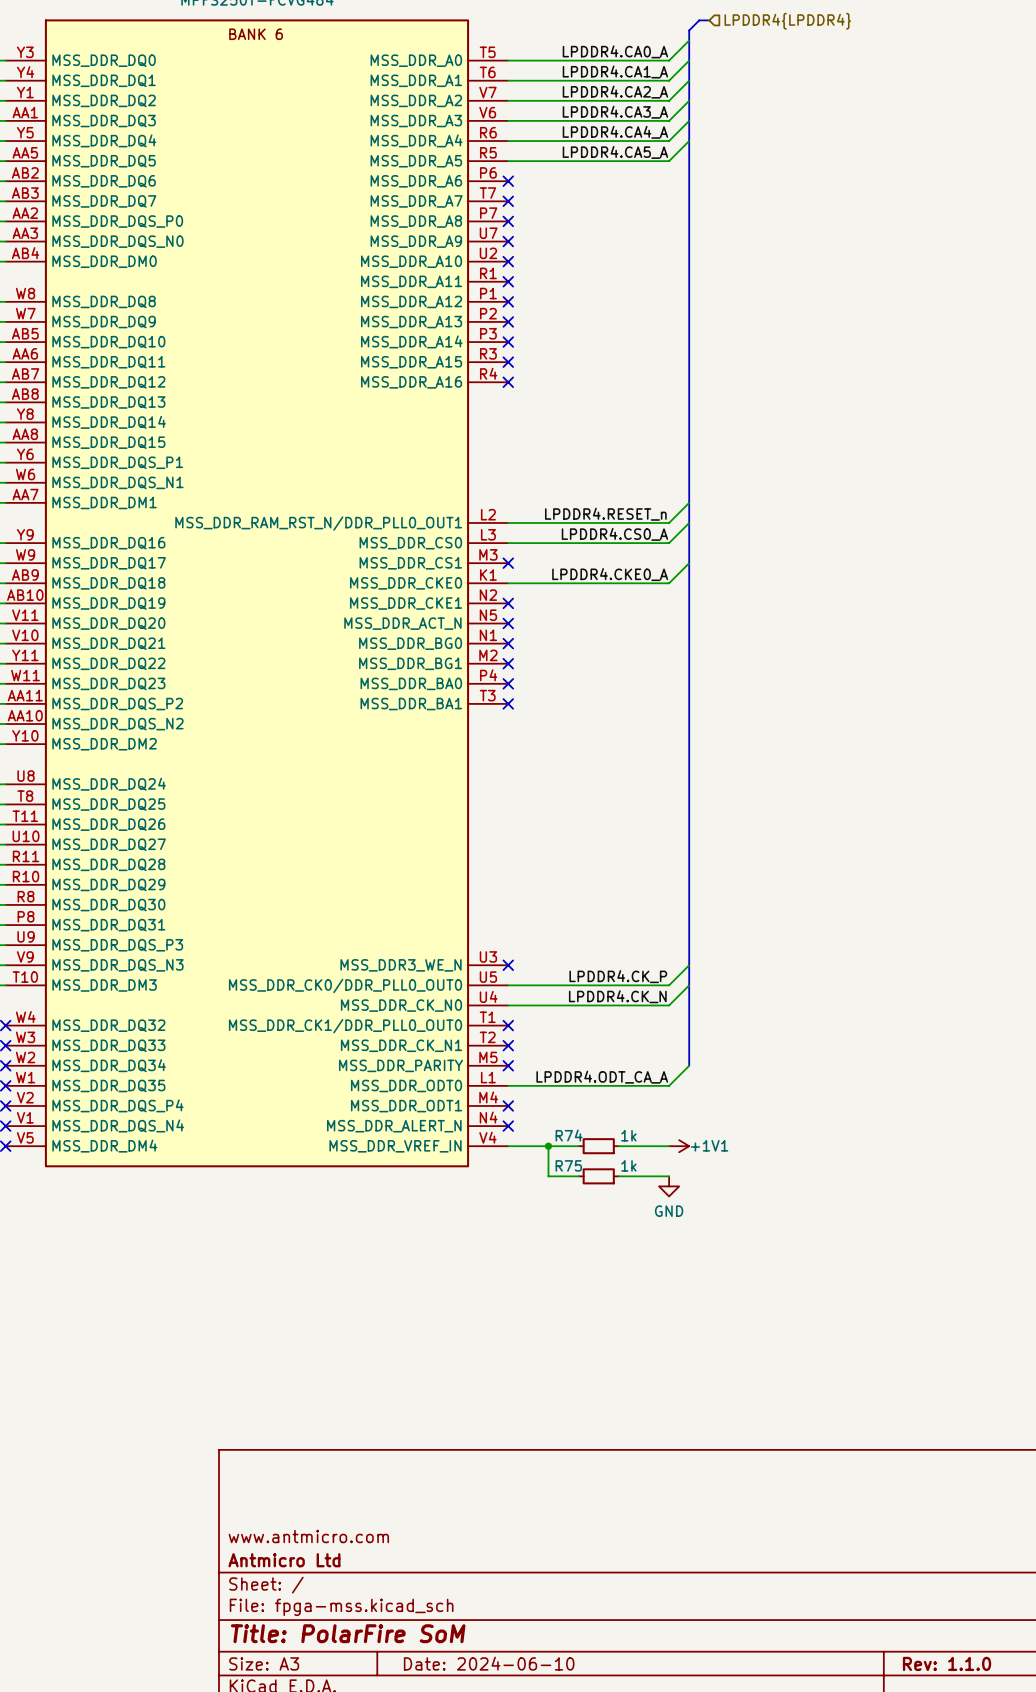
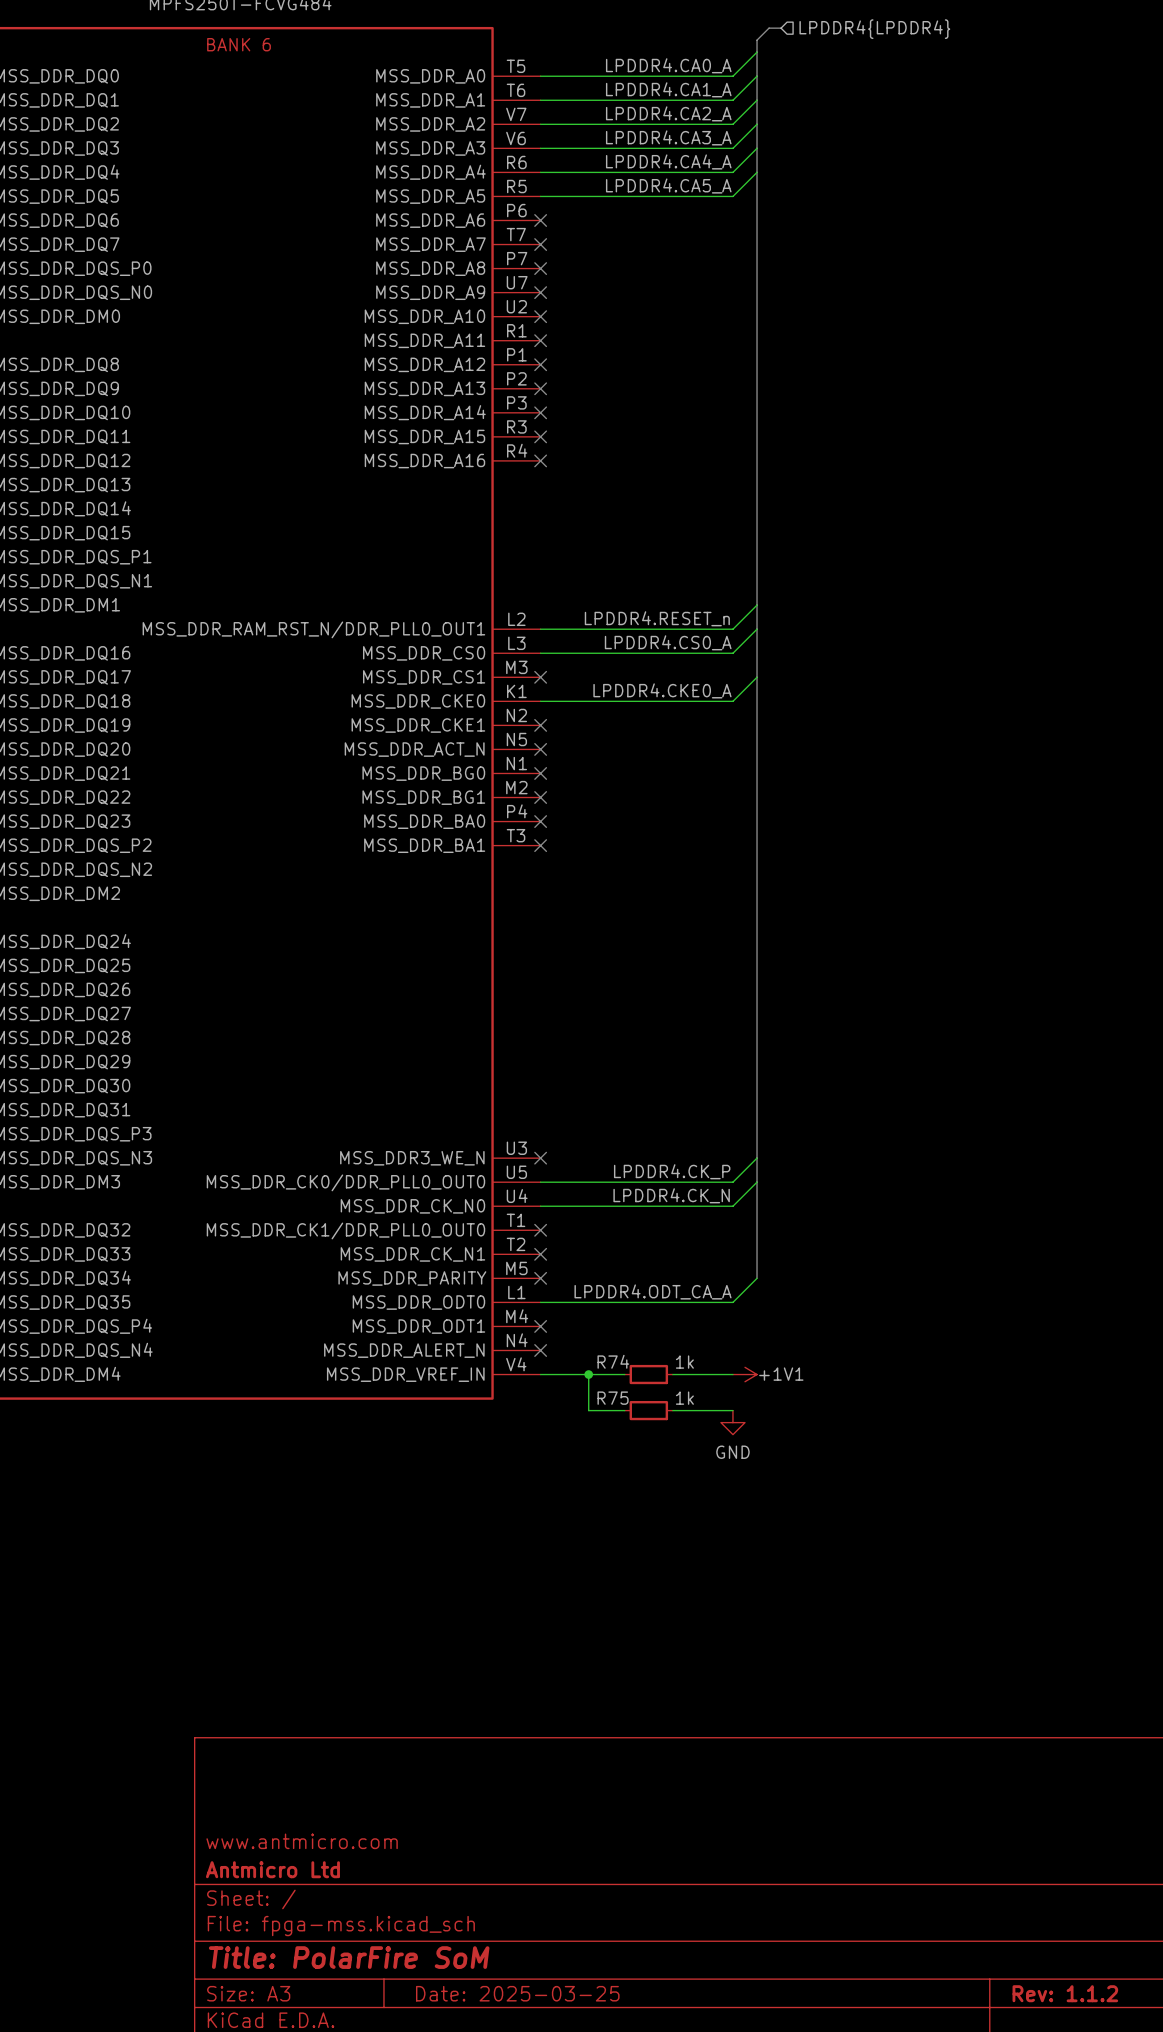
title block: Date: 2024-06-10 (489, 1663) -> Date: 2025-03-25 (517, 1993)
title block: Rev: 1.1.0 (947, 1663) -> Rev: 1.1.2 (1065, 1993)

